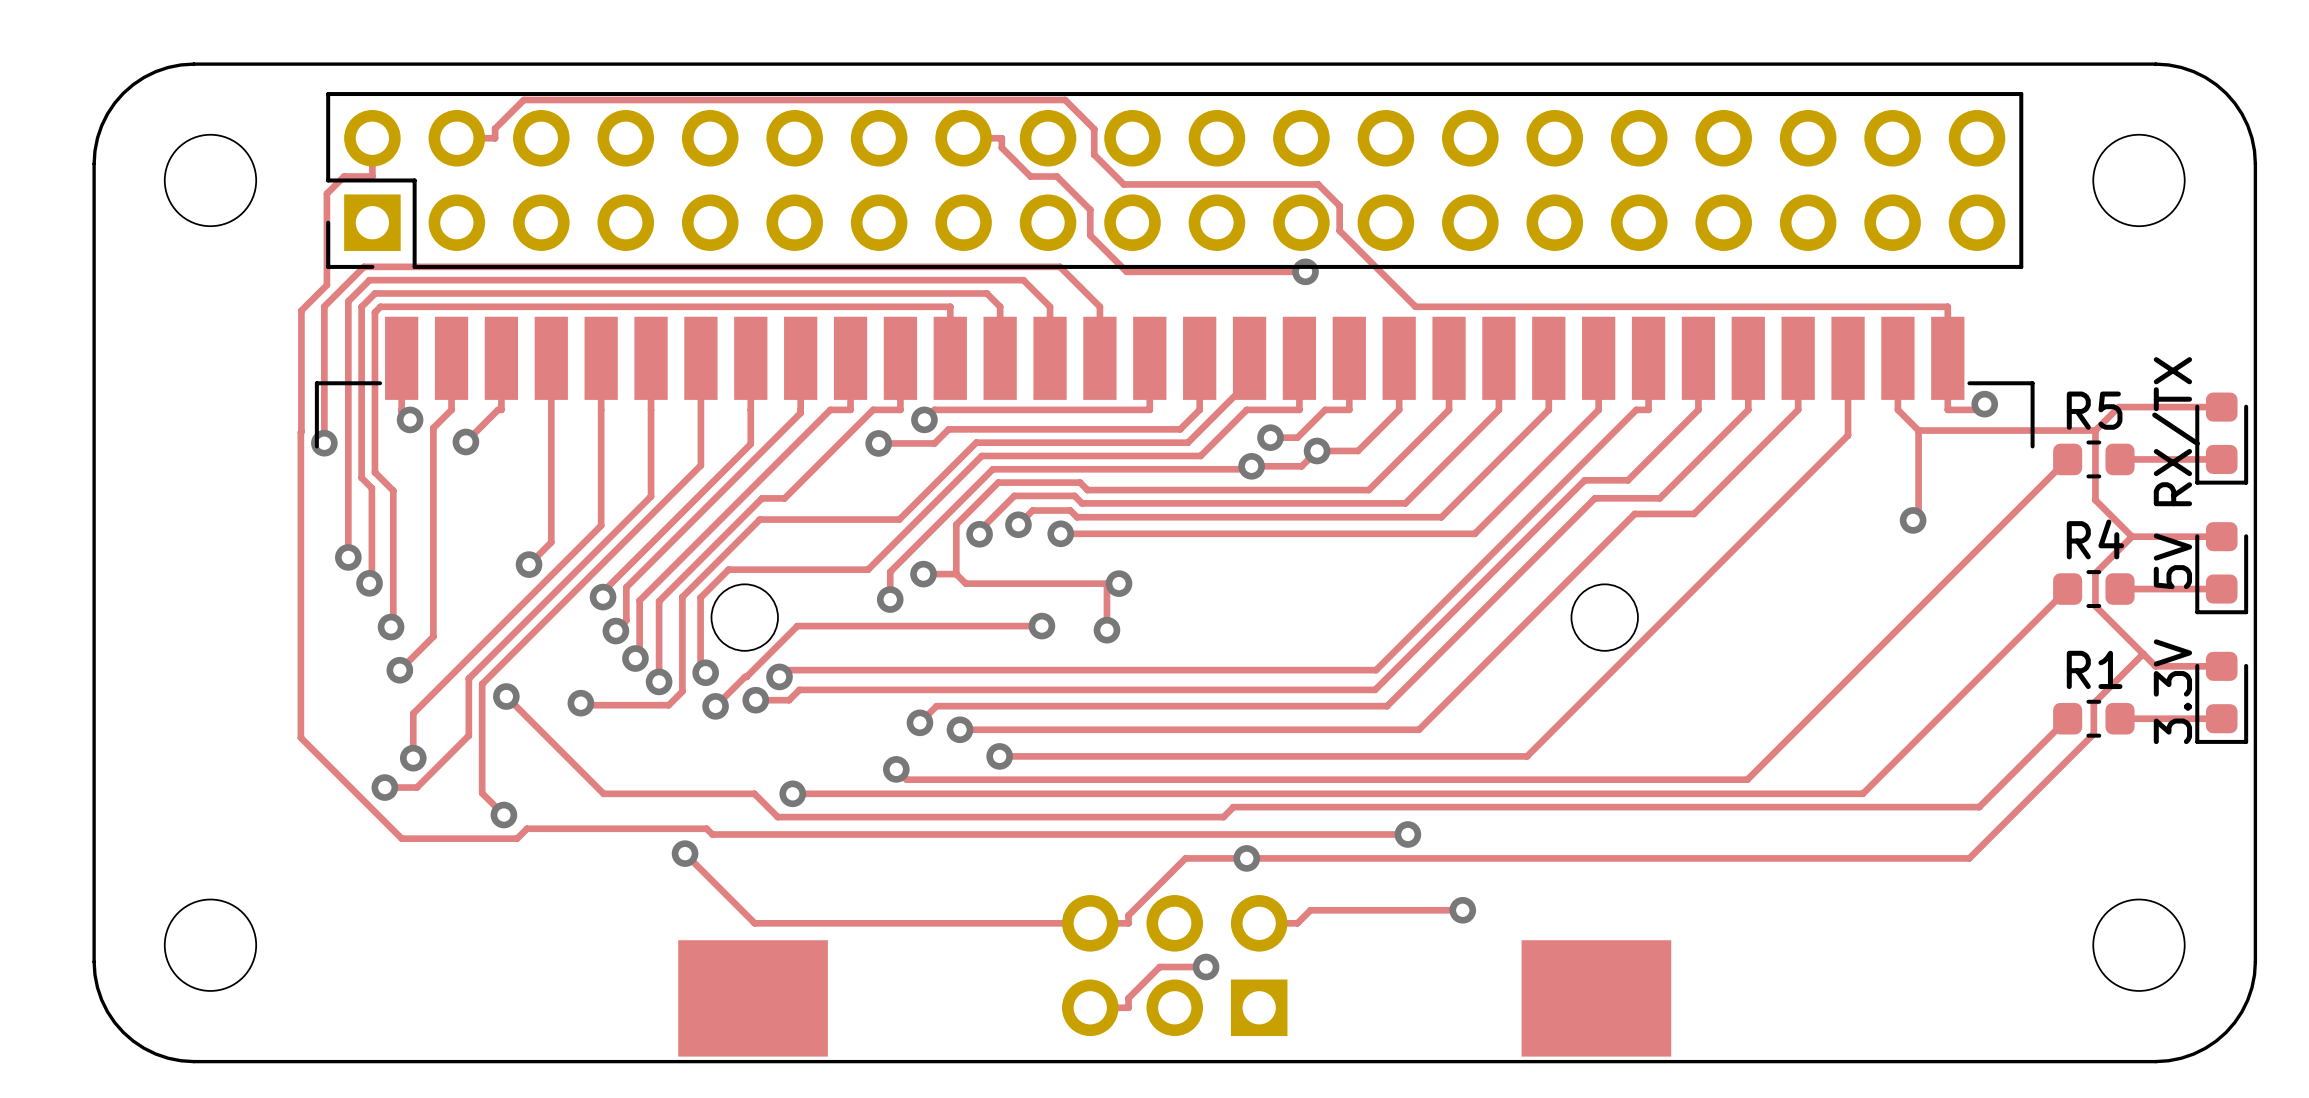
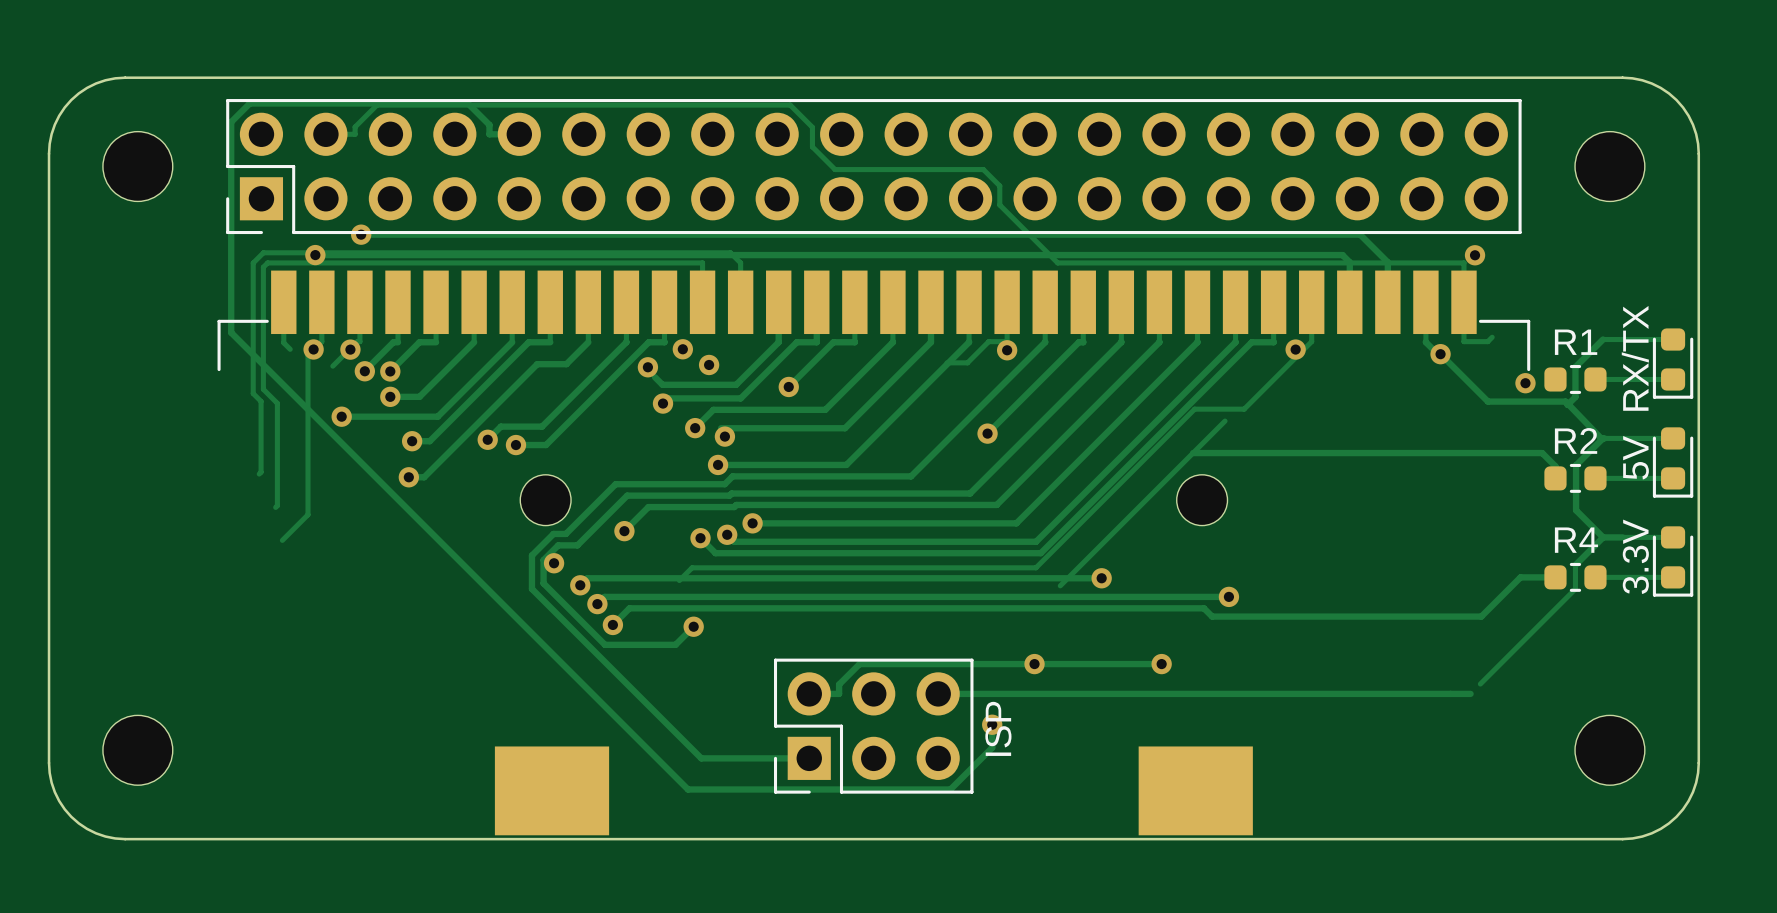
track: (372, 138) (372, 176) (344, 176) (326, 193) (326, 285) (301, 310) (300, 737) (401, 838) (517, 838) (527, 828) (706, 828) (712, 834) (1407, 834) -> none
track: none -> (519, 134) (489, 134) (489, 124) (468, 103) (249, 103) (231, 122) (231, 332) (688, 789) (950, 789) (992, 747) (992, 724)
track: (963, 138) (1001, 138) (1001, 147) (1030, 176) (1056, 176) (1090, 209) (1090, 235) (1126, 271) (1305, 271) -> none
via: none -> (361, 234)
via: (1305, 271) -> none
via: none -> (315, 255)
via: none -> (1475, 255)
track: (1050, 358) (1050, 306) (1023, 280) (369, 280) (348, 301) (348, 557) -> (778, 302) (778, 342) (736, 384) (662, 384) (654, 377)
track: (1099, 358) (1099, 306) (1059, 266) (364, 266) (324, 306) (324, 443) -> (816, 302) (816, 342) (796, 342) (740, 398) (668, 398) (663, 403)
track: (1798, 358) (1798, 409) (1694, 513) (1634, 513) -> (1349, 302) (1349, 262) (1342, 255) (315, 255)
track: (1848, 358) (1848, 435) (1527, 756) (999, 756) -> (1387, 302) (1387, 262) (1360, 234) (361, 234)
track: (1249, 381) (1187, 442) (976, 442) (899, 519) (759, 519) (682, 597) (682, 691) (668, 705) (582, 705) (580, 703) -> (930, 319) (930, 342) (845, 428) (721, 428)
via: (1984, 404) -> none
track: (2129, 407) (2118, 407) (2095, 430) -> (1603, 339) (1575, 367) (1575, 397) (1568, 403)
track: (850, 409) (830, 409) (639, 600) (639, 654) (635, 658) -> (626, 341) (542, 426) (500, 426) (487, 439)
track: (900, 409) (873, 409) (784, 498) (761, 498) (659, 601) (659, 681) -> (664, 341) (648, 342) (546, 445) (515, 445)
track: (1149, 409) (934, 409) (924, 419) -> (854, 341) (833, 342) (788, 386)
track: (1199, 409) (1180, 429) (948, 429) (934, 443) (878, 443) -> (892, 341) (825, 409) (713, 409) (695, 428)
track: (1299, 409) (1246, 409) (1200, 455) (981, 455) (868, 569) (728, 569) (700, 597) (700, 667) (705, 672) -> (969, 341) (846, 464) (718, 464)
track: (1399, 409) (1358, 450) (1317, 450) (1301, 466) (1251, 466) (1248, 469) (992, 469) (890, 571) (890, 599) -> (1045, 341) (911, 476) (732, 476) (724, 484) (615, 484) (565, 533) (553, 533) (531, 555) (531, 589) (701, 758) (809, 758)
track: (1449, 409) (1368, 490) (1087, 490) (1080, 482) (998, 482) (956, 524) (956, 574) -> (1083, 341) (1078, 342) (987, 433)
track: (1498, 409) (1405, 503) (1082, 503) (1074, 495) (1014, 495) (979, 530) (979, 534) -> (1121, 341) (970, 493) (627, 495) (577, 545) (558, 545) (543, 560) (543, 583) (605, 644) (675, 644) (693, 626)
track: (1548, 409) (1441, 517) (1077, 517) (1070, 510) (1032, 510) (1018, 524) -> (1159, 341) (996, 504) (736, 504) (734, 507) (648, 507) (624, 531)
track: (1598, 409) (1474, 533) (1060, 533) -> (1197, 341) (1016, 523) (752, 523)
track: (1648, 409) (1636, 409) (1376, 670) (786, 670) (779, 676) -> (1235, 341) (1036, 541) (734, 541) (727, 534)
track: (1698, 409) (1627, 480) (1584, 480) (1375, 689) (799, 689) (789, 700) (755, 700) -> (1273, 341) (1251, 342) (1040, 553) (715, 553) (700, 538)
track: (1897, 409) (1918, 430) -> (1425, 341) (1487, 401) (1565, 401) (1568, 403)
track: (551, 410) (551, 542) (529, 564) -> (398, 342) (393, 342) (364, 370)
track: (601, 410) (601, 525) (413, 713) (413, 758) -> (436, 342) (419, 342) (390, 371)
track: (651, 410) (651, 496) (468, 678) (468, 735) (416, 787) (384, 787) -> (474, 342) (419, 396) (390, 396)
track: (700, 410) (700, 465) (482, 684) (482, 793) (503, 815) -> (512, 342) (437, 416) (341, 416)
track: (750, 410) (750, 444) (603, 591) (603, 597) -> (550, 342) (528, 342) (429, 441) (412, 441)
track: (800, 410) (800, 413) (626, 587) (626, 620) (615, 631) -> (588, 342) (566, 364) (537, 364) (424, 477) (408, 477)
R5 name: R5 (2094, 410) -> R1 (1576, 342)
via: (410, 419) -> none
via: none -> (313, 349)
via: none -> (350, 349)
via: none -> (1295, 349)
via: none -> (1007, 350)
via: none -> (1440, 354)
track: (1918, 430) (1918, 514) (1913, 520) -> none
track: (1918, 430) (2095, 430) -> none
track: (2095, 430) (2095, 500) (2132, 536) (2095, 573) (2095, 606) (2155, 666) -> (1603, 537) (1622, 537)
via: (1270, 437) -> none
via: none -> (709, 364)
via: (465, 442) -> none
via: (324, 443) -> none
via: none -> (364, 371)
via: none -> (390, 371)
via: (1317, 450) -> none
track: (2067, 459) (1747, 779) (906, 779) (896, 769) -> none
via: none -> (1525, 383)
via: (1251, 466) -> none
via: none -> (788, 386)
via: none -> (390, 396)
via: none -> (663, 403)
track: none -> (1568, 403) (1602, 439)
via: none -> (341, 416)
via: (1913, 520) -> none
via: none -> (695, 428)
via: (1018, 524) -> none
via: none -> (987, 433)
via: (1060, 533) -> none
track: none -> (1604, 438) (1576, 465) (1576, 510) (1603, 537)
via: none -> (487, 439)
R4 name: R4 (2095, 539) -> R2 (1576, 440)
via: none -> (412, 441)
via: none -> (515, 445)
via: (348, 557) -> none
via: (529, 564) -> none
via: none -> (718, 464)
track: (923, 574) (956, 574) -> none
via: (923, 574) -> none
track: (956, 574) (965, 583) (1119, 583) -> none
via: (369, 583) -> none
track: (1106, 583) (1106, 630) -> none
via: (1119, 583) -> none
via: none -> (408, 477)
track: (2067, 589) (1862, 793) (792, 793) -> (1555, 478) (1555, 466) (1542, 453) (1193, 453)
via: (603, 597) -> none
via: (890, 599) -> none
track: (1041, 626) (797, 626) (715, 706) -> none
via position: (1041, 626) -> (752, 523)
via: (391, 627) -> none
via: (1106, 630) -> none
via: (615, 631) -> none
track: (2143, 653) (2093, 703) -> (1603, 537) (1575, 565)
via: (635, 658) -> none
via: none -> (624, 531)
via: none -> (727, 534)
via: none -> (700, 538)
R1 name: R1 (2094, 669) -> R4 (1576, 540)
via: (399, 670) -> none
via: (705, 672) -> none
via: (779, 676) -> none
via: (659, 681) -> none
track: (506, 696) (603, 793) (754, 793) (777, 817) (1223, 817) (1233, 807) (1979, 807) (2067, 718) -> (612, 624) (629, 608) (1203, 608) (1212, 616) (1481, 616) (1520, 577) (1555, 577)
via: (506, 696) -> none
via: (580, 703) -> none
via: (715, 706) -> none
track: none -> (1101, 578) (587, 578) (580, 585)
via: none -> (1101, 578)
via: (919, 722) -> none
via: none -> (580, 585)
track: (959, 729) (1418, 729) -> none
via: (959, 729) -> none
track: none -> (1228, 596) (604, 596) (597, 604)
via: none -> (1228, 596)
via: none -> (597, 604)
via: (999, 756) -> none
via: (413, 758) -> none
via: (896, 769) -> none
via: none -> (612, 624)
via: none -> (693, 626)
via: (384, 787) -> none
via: (792, 793) -> none
via: (503, 815) -> none
track: none -> (1161, 664) (859, 664) (839, 684) (839, 693) (809, 693)
via: none -> (1161, 664)
via position: (1407, 834) -> (1034, 664)
track: (685, 853) (754, 923) (1128, 923) (1128, 915) (1185, 858) (1969, 858) -> none
via: (685, 853) -> none
via: (1246, 858) -> none
track: none -> (938, 693) (1470, 693)
track: (1462, 910) (1310, 910) (1297, 923) (1259, 923) -> none
via: (1462, 910) -> none
via: none -> (992, 724)
text: none -> ISP (998, 728)
part side: bottom (1174, 965) -> top (873, 726)
track: (1206, 967) (1159, 967) (1128, 998) (1128, 1007) (1090, 1007) -> none
via: (1206, 967) -> none

